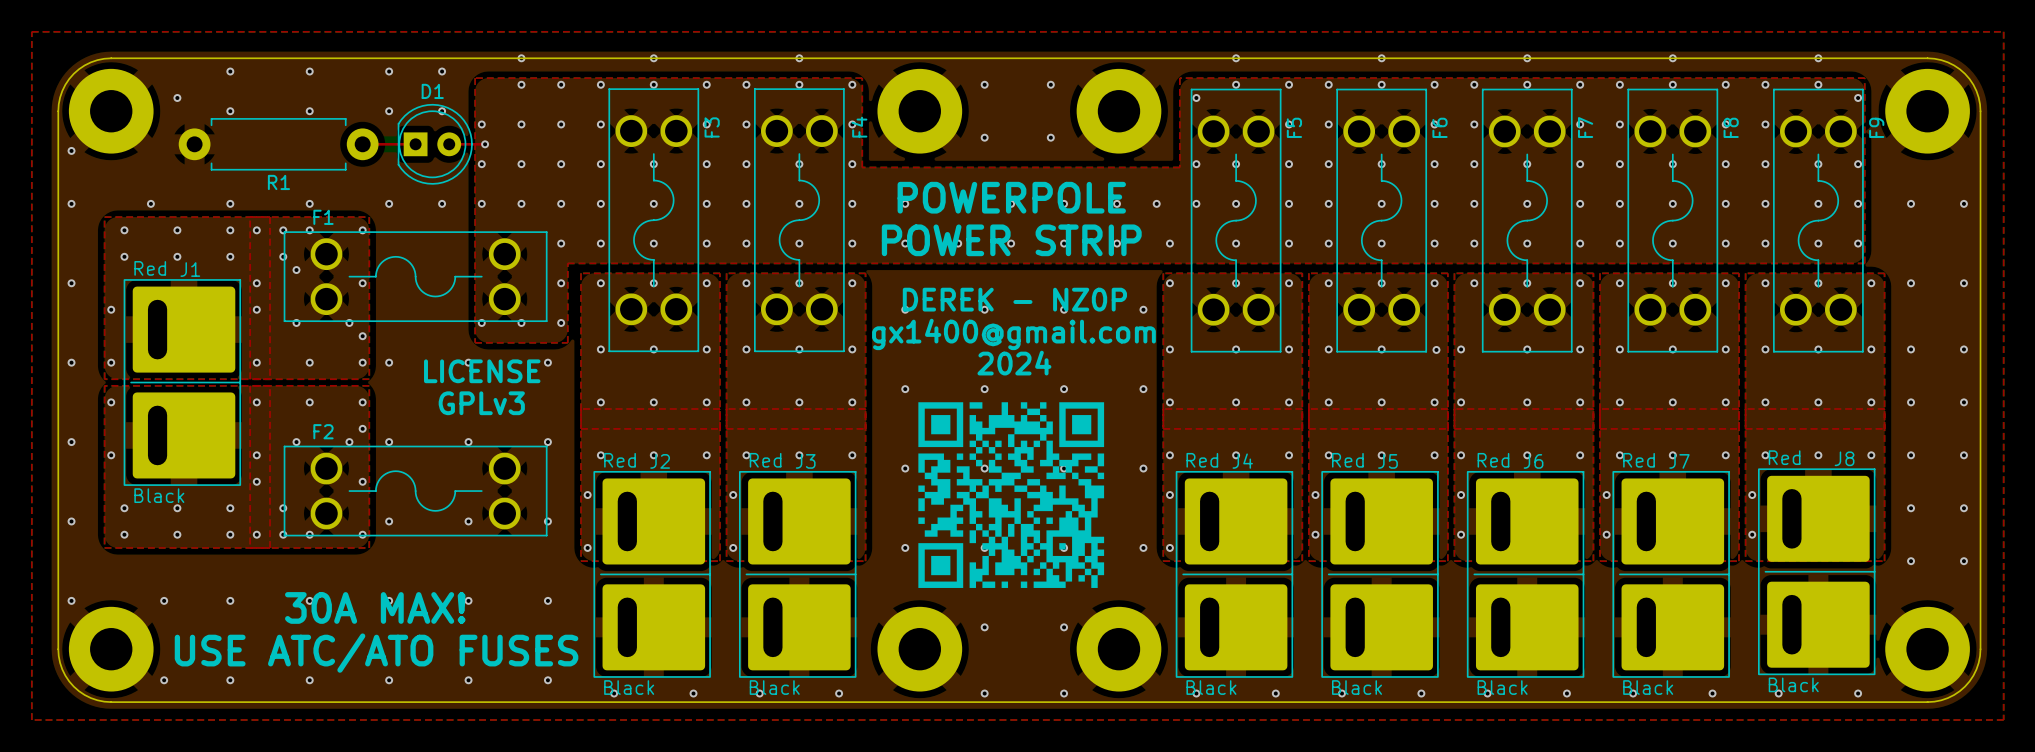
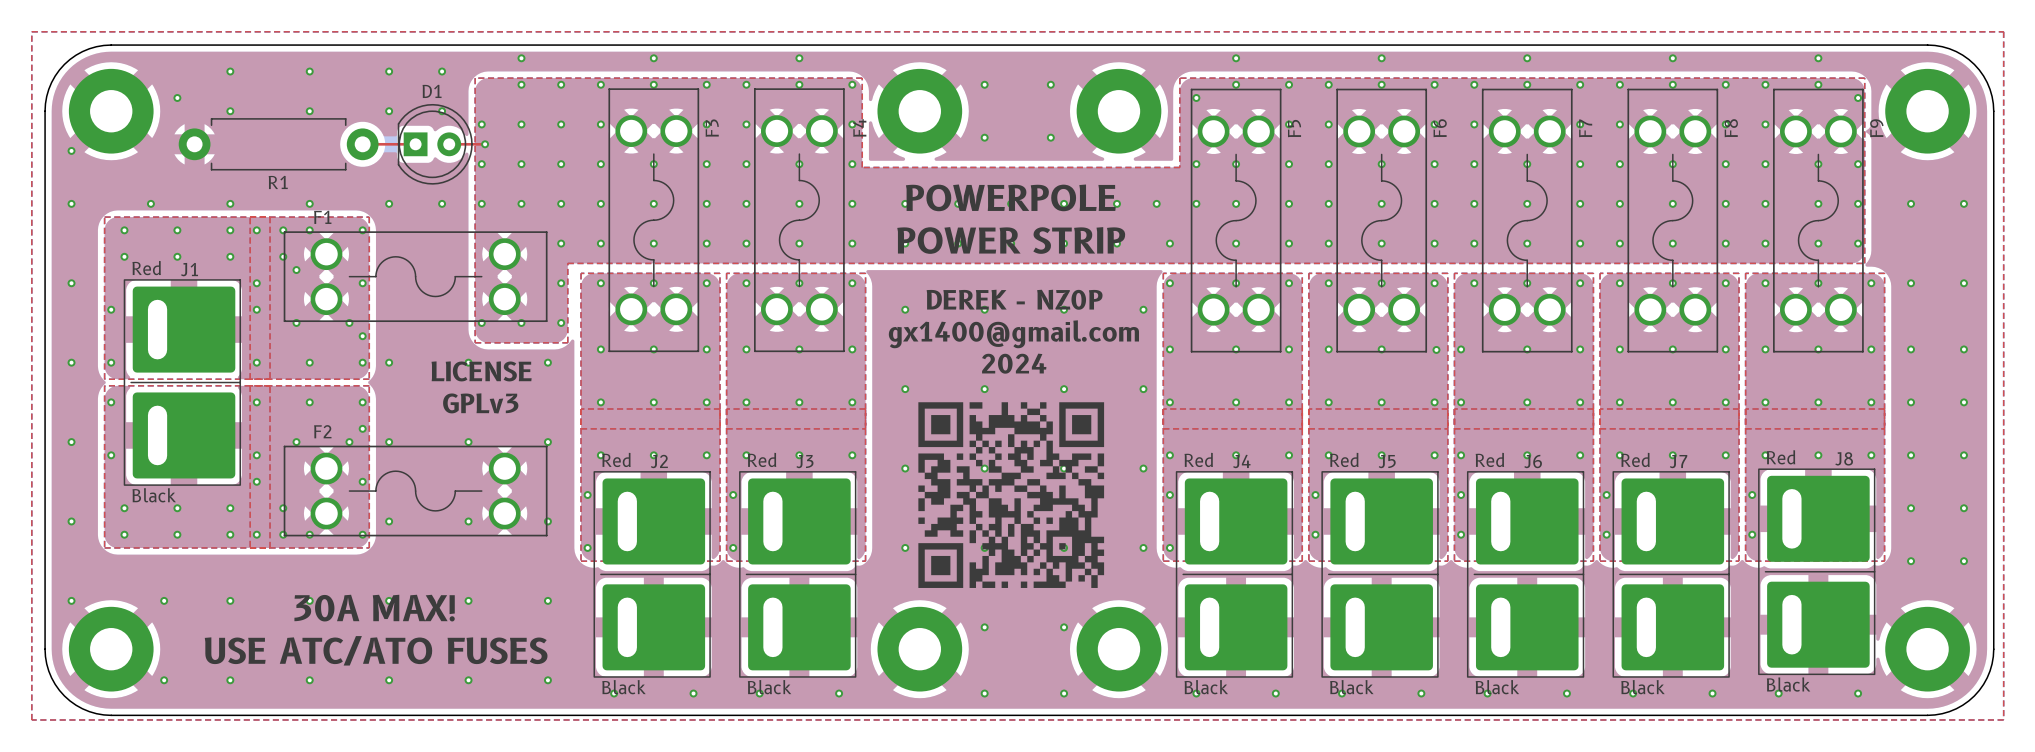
board edge: (111, 58) (1927, 58) (1941, 60) (1954, 65) (1969, 79) (1978, 97) (1980, 111) (1980, 649) (1978, 662) (1969, 681) (1959, 691) (1941, 700) (1927, 702) (111, 702) (97, 700) (84, 695) (69, 681) (62, 669) (58, 656) (58, 111) (62, 90) (73, 73) (90, 62) (111, 58) -> (111, 45) (89, 48) (76, 55) (64, 64) (51, 82) (46, 96) (45, 111) (45, 656) (48, 671) (59, 690) (69, 700) (89, 711) (111, 715) (1927, 715) (1949, 711) (1968, 700) (1979, 690) (1990, 671) (1993, 649) (1993, 103) (1987, 82) (1979, 69) (1968, 59) (1949, 48) (1927, 45) (111, 45)

